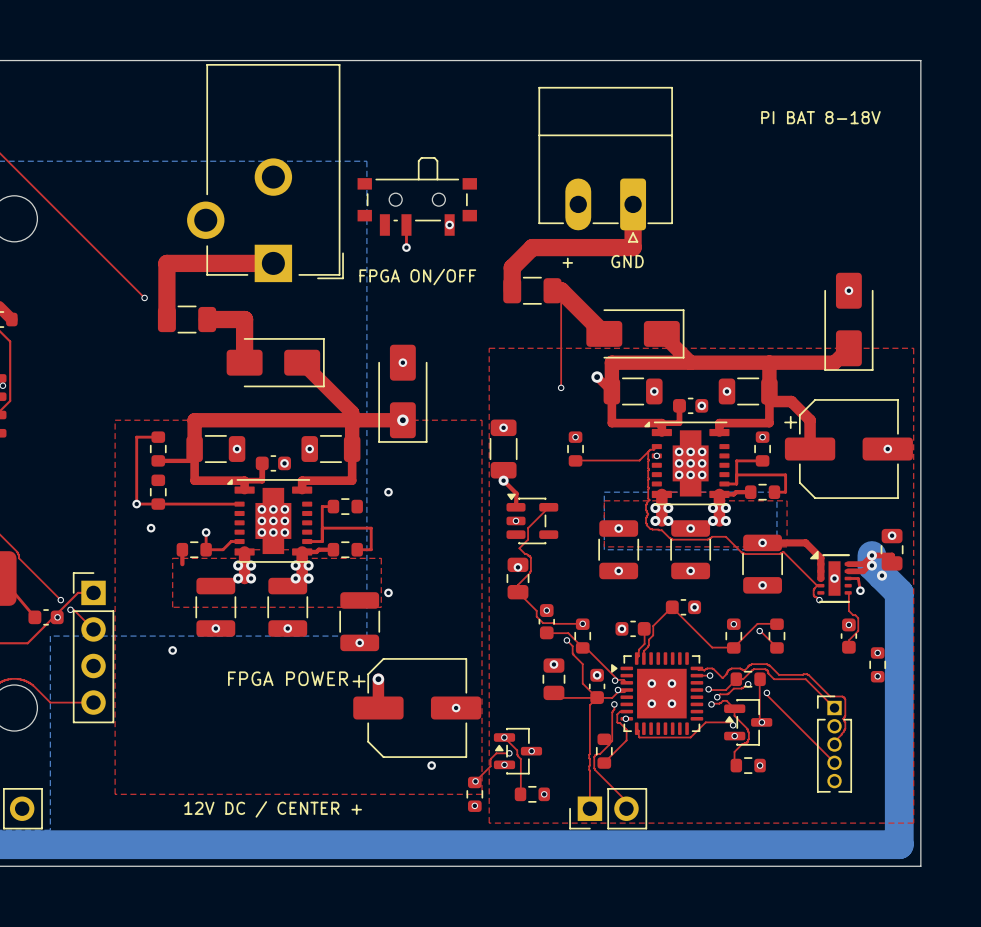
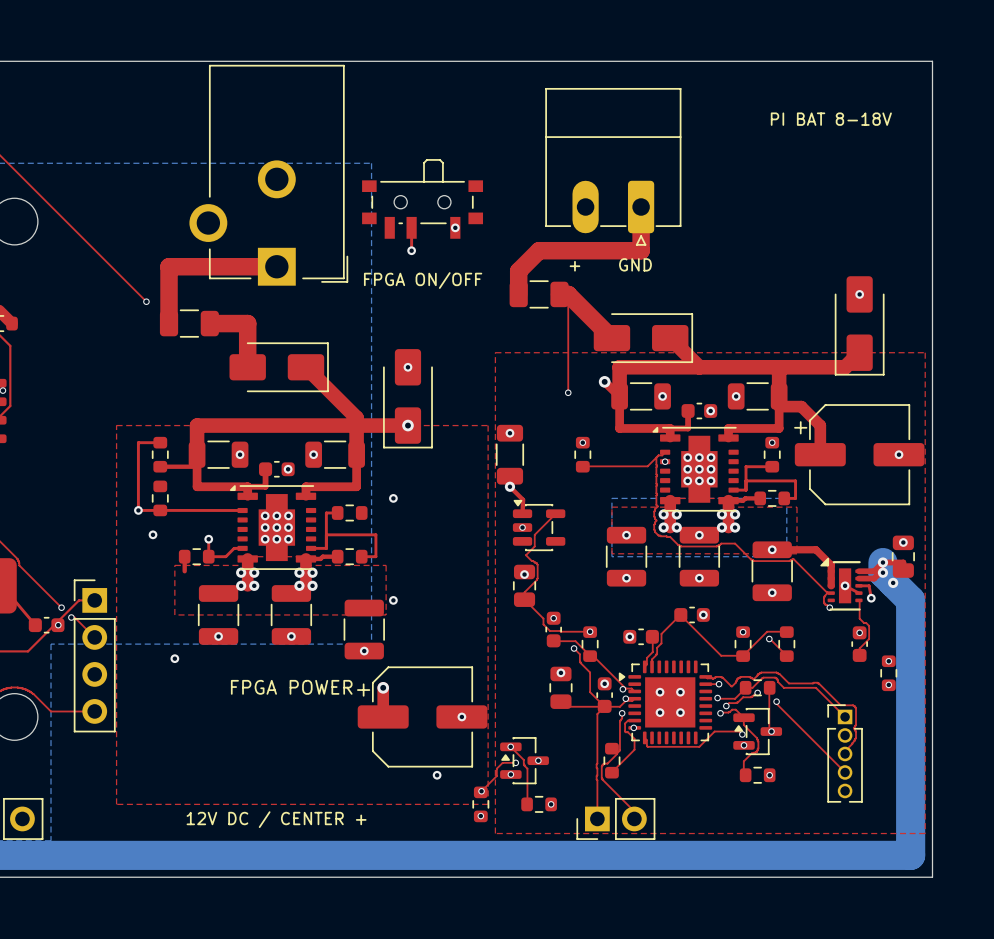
top track: none -> (845, 585) (858, 593)

